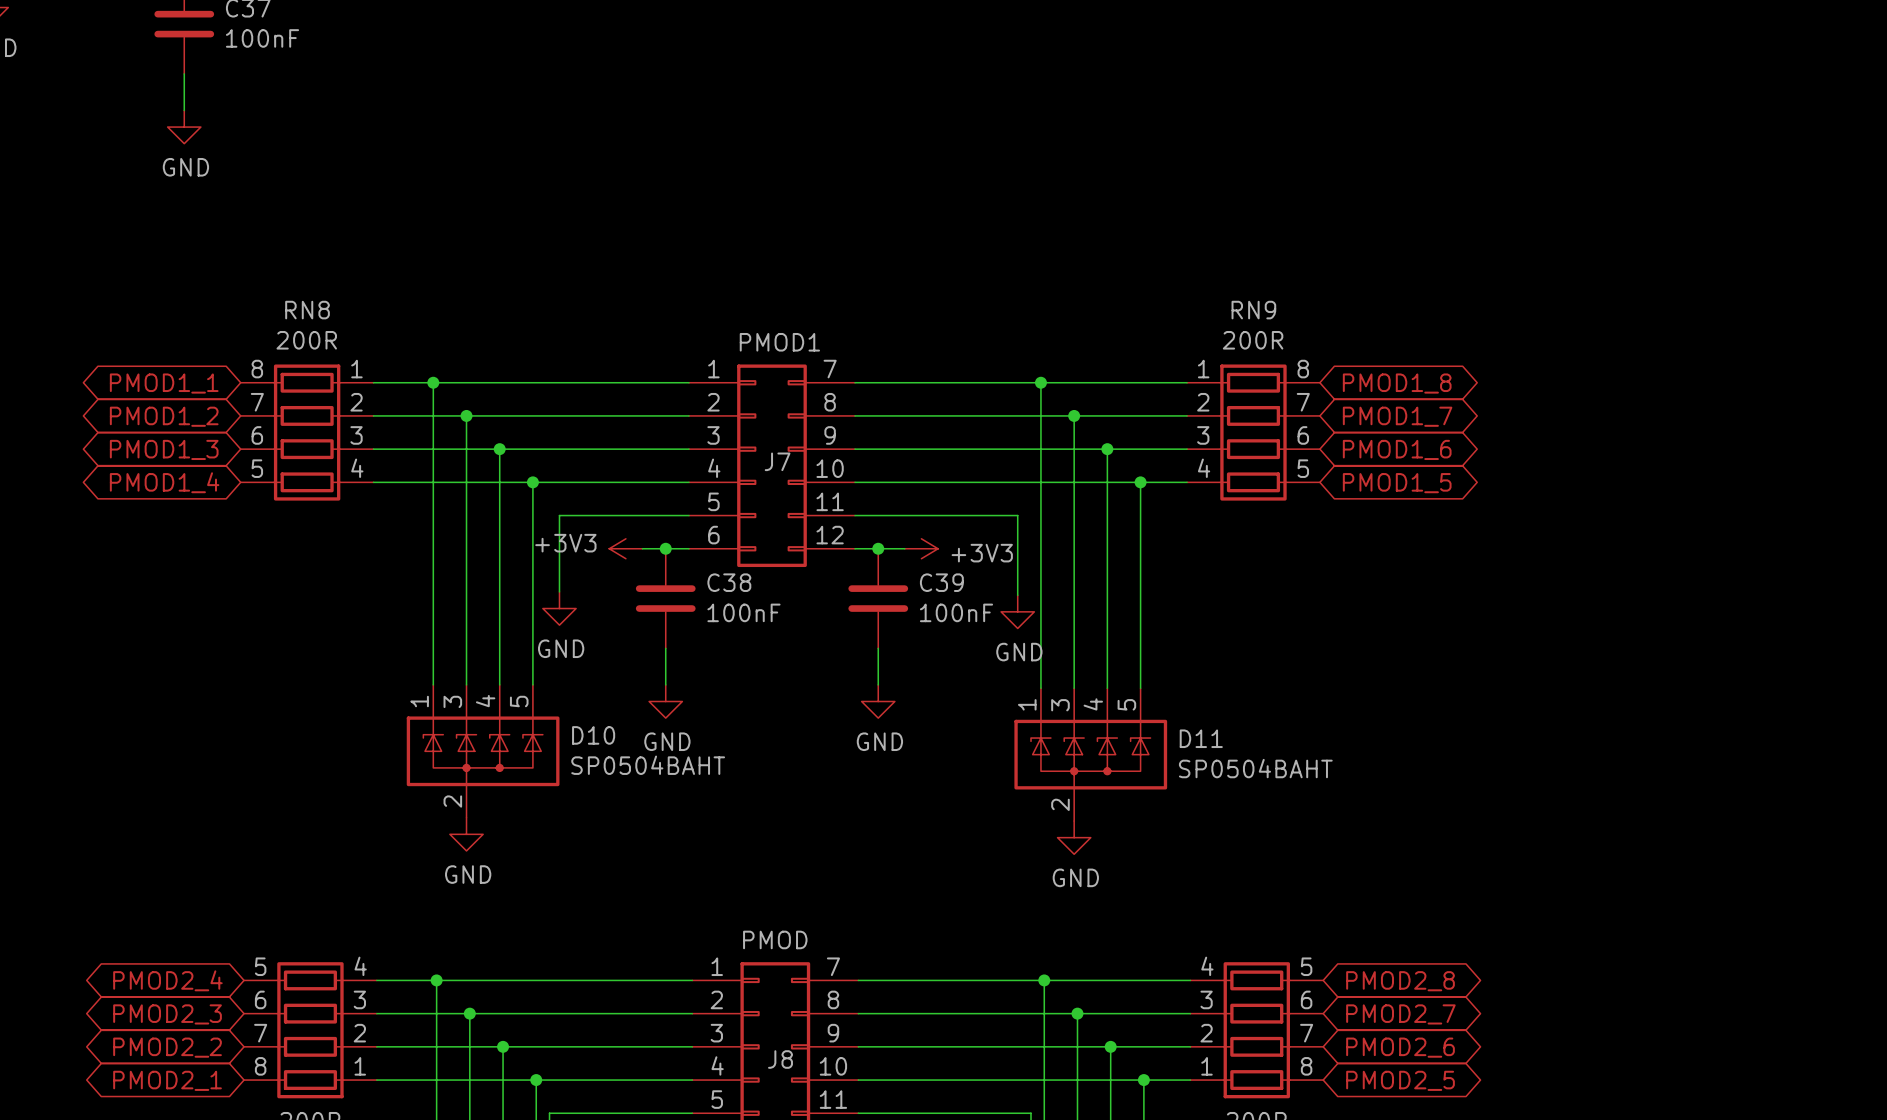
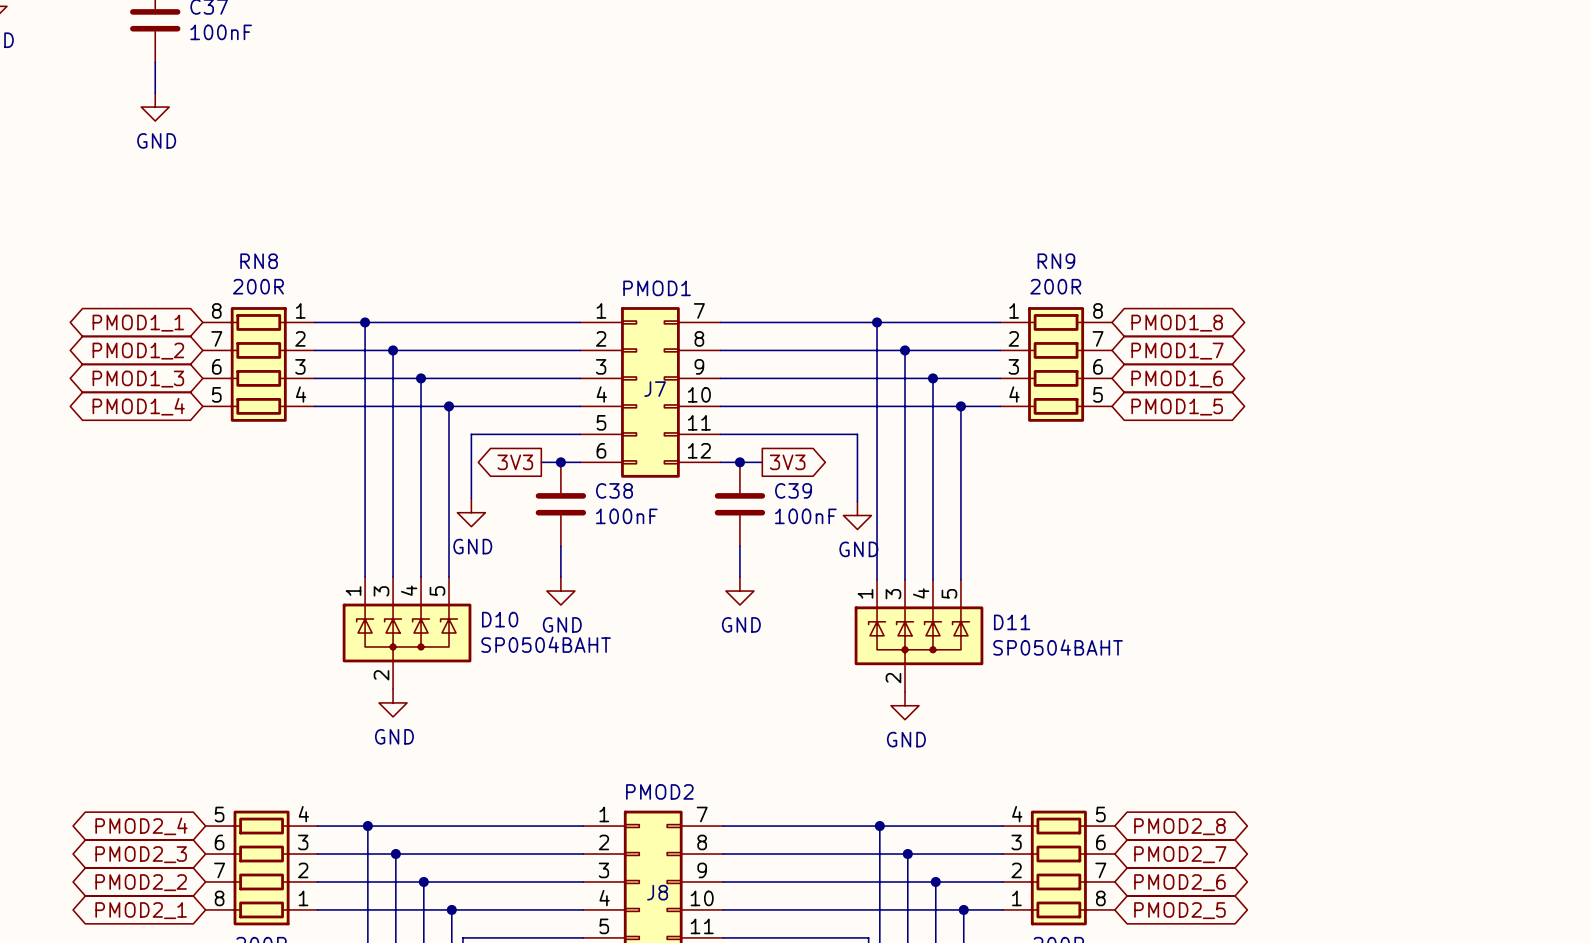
global label: none -> 3V3 (515, 462)
power symbol: +3V3 (625, 548) -> none
power symbol: +3V3 (921, 548) -> none
global label: none -> 3V3 (787, 462)
J8 value: PMOD (775, 939) -> PMOD2 (659, 791)

